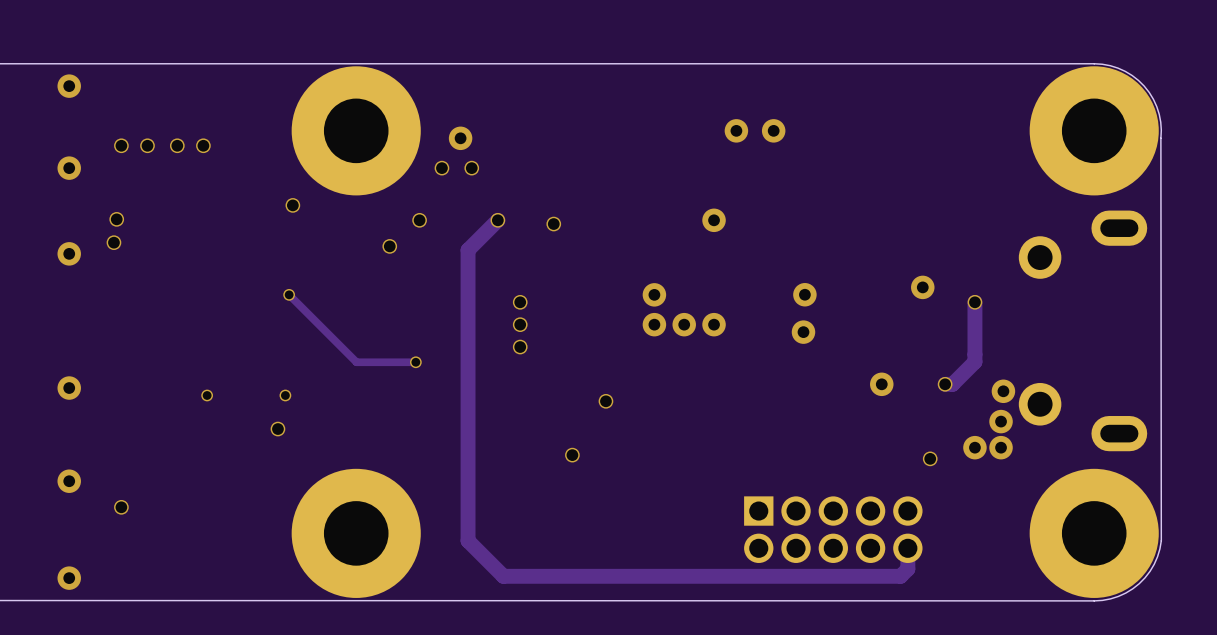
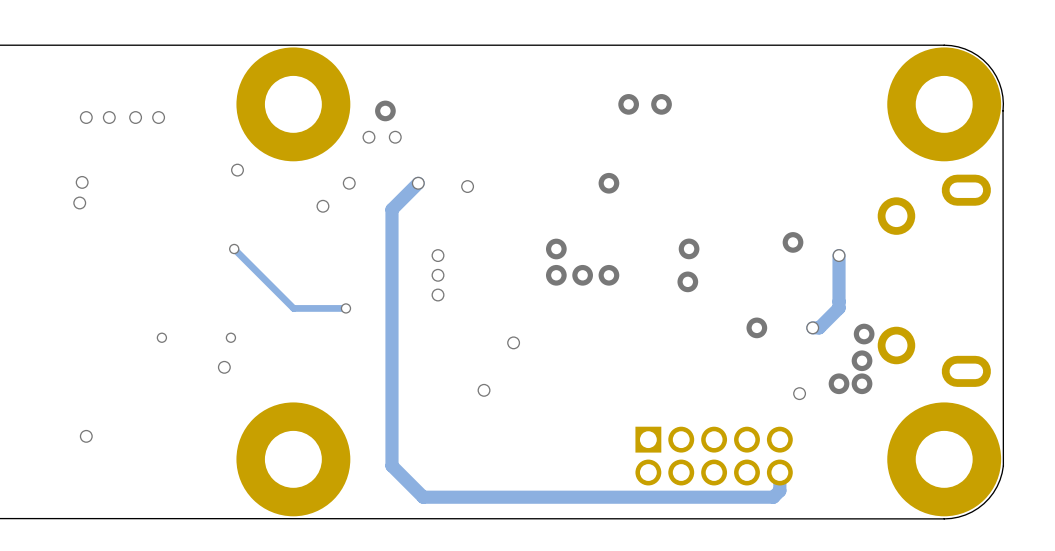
via: (69, 86) -> none
via: (69, 168) -> none
via: (69, 253) -> none
via: (69, 388) -> none
via: (69, 481) -> none
via: (69, 578) -> none

